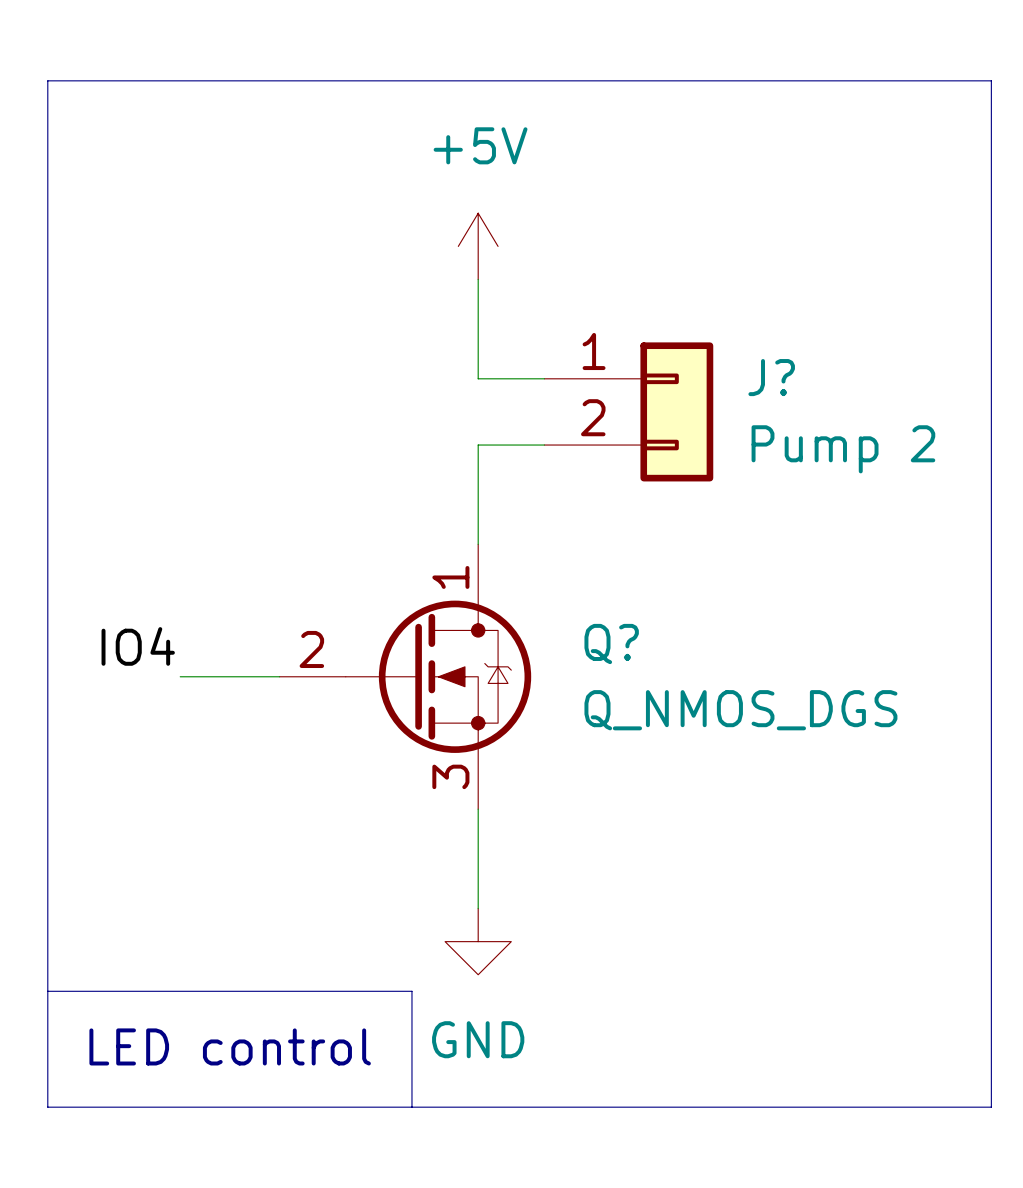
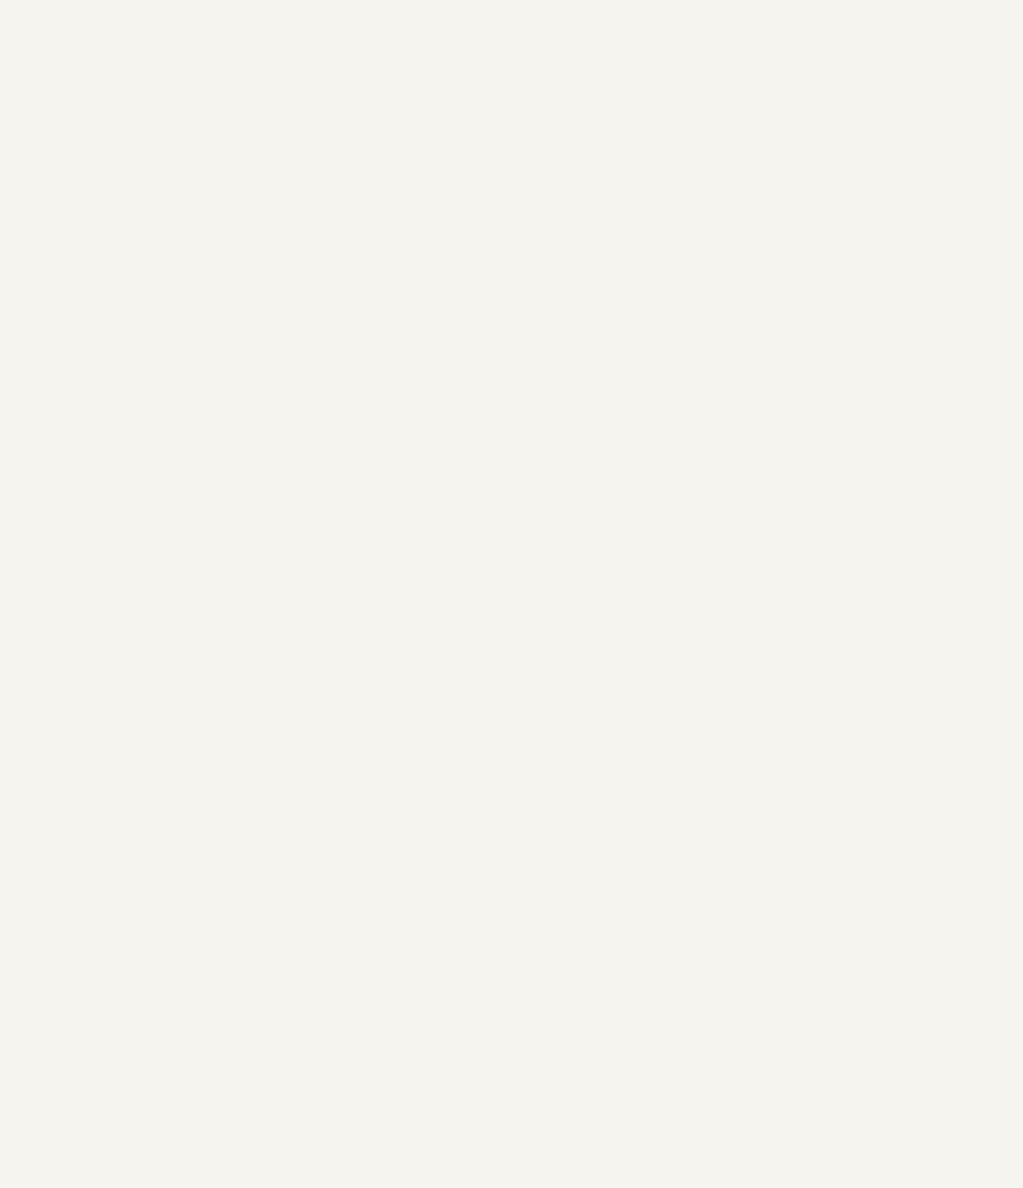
line: (47, 80) (991, 80) (991, 1107) (47, 1107) (47, 80) -> none
power symbol: +5V (478, 246) -> none
wire: (478, 279) (478, 378) (544, 378) -> none
J?: Pump 2 (628, 411) -> none
wire: (544, 445) (478, 445) (478, 544) -> none
label: IO4 (138, 646) -> none
wire: (180, 676) (279, 676) -> none
Q?: Q_NMOS_DGS (405, 676) -> none
wire: (478, 809) (478, 908) -> none
power symbol: GND (478, 941) -> none
line: (47, 991) (411, 991) (411, 1107) -> none
text: LED control (230, 1046) -> none

